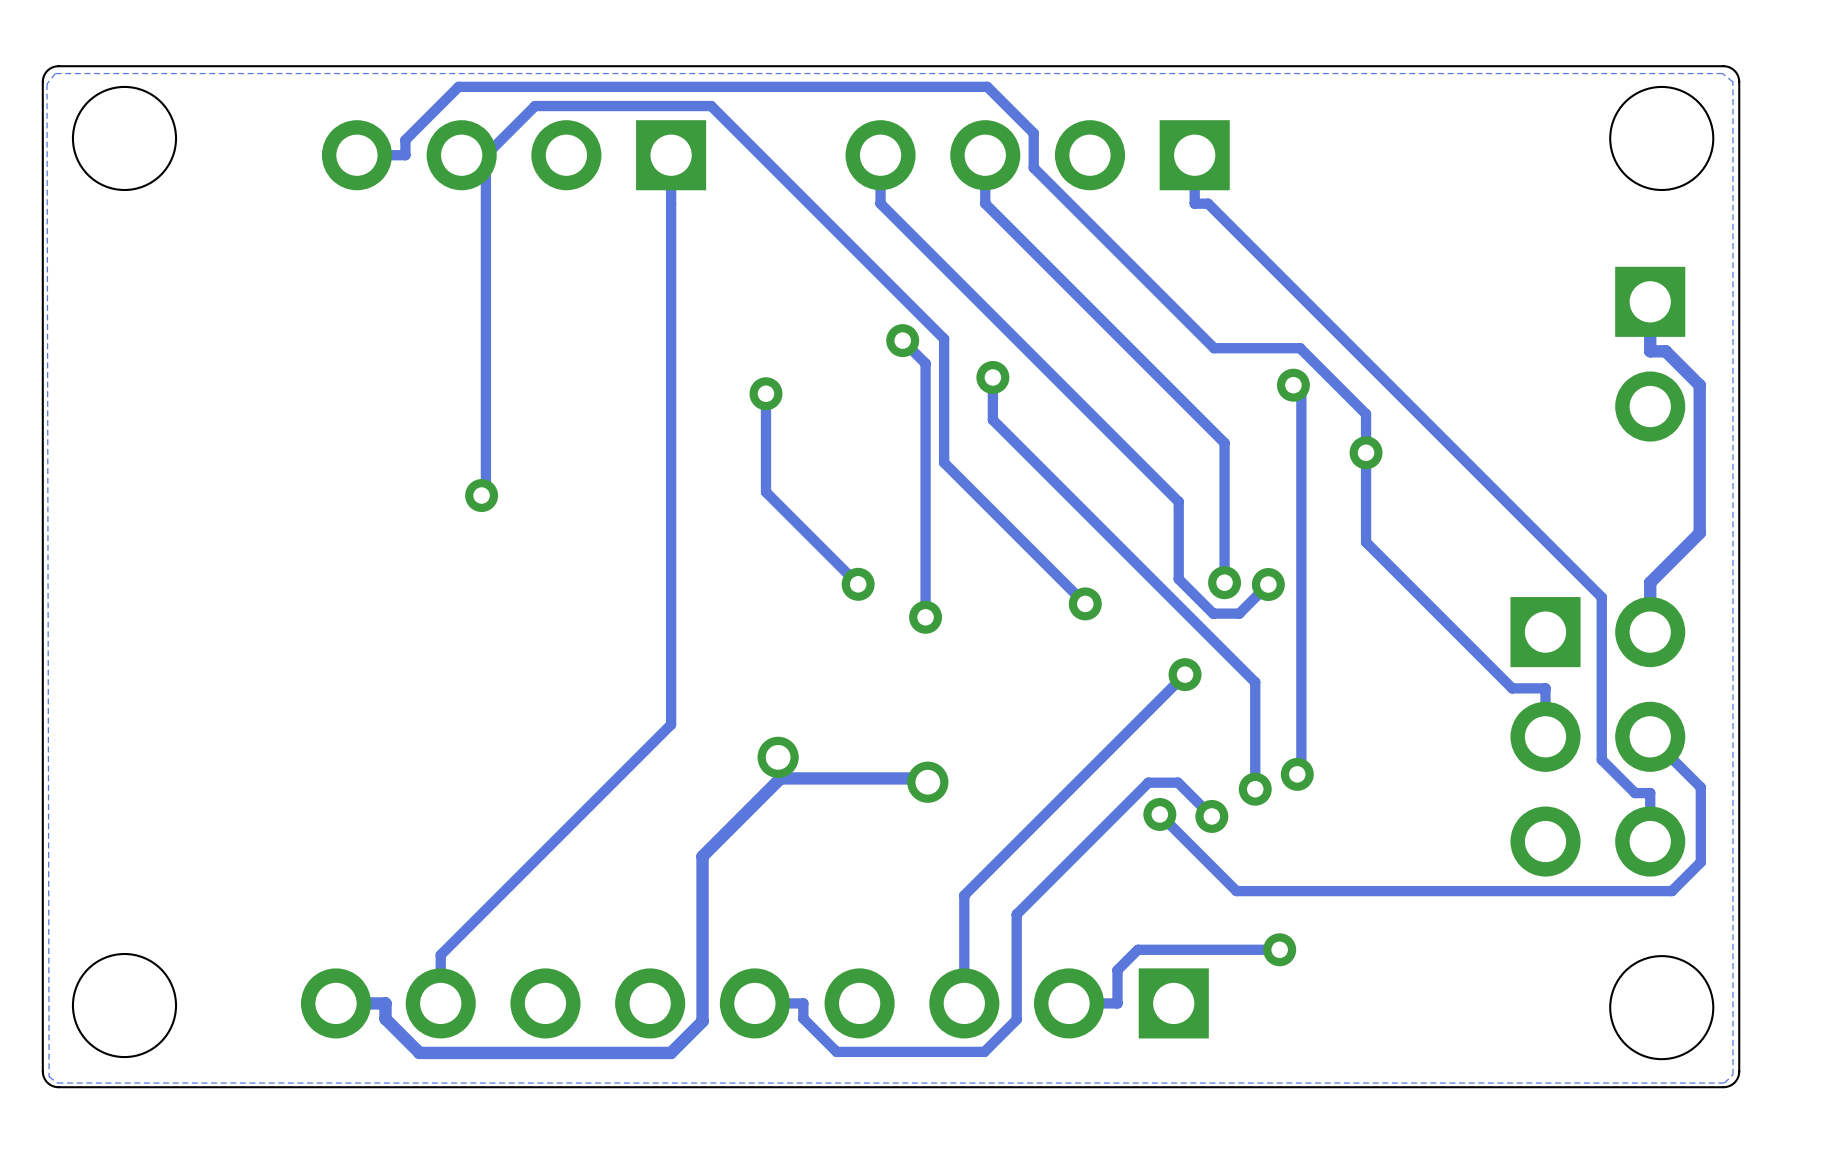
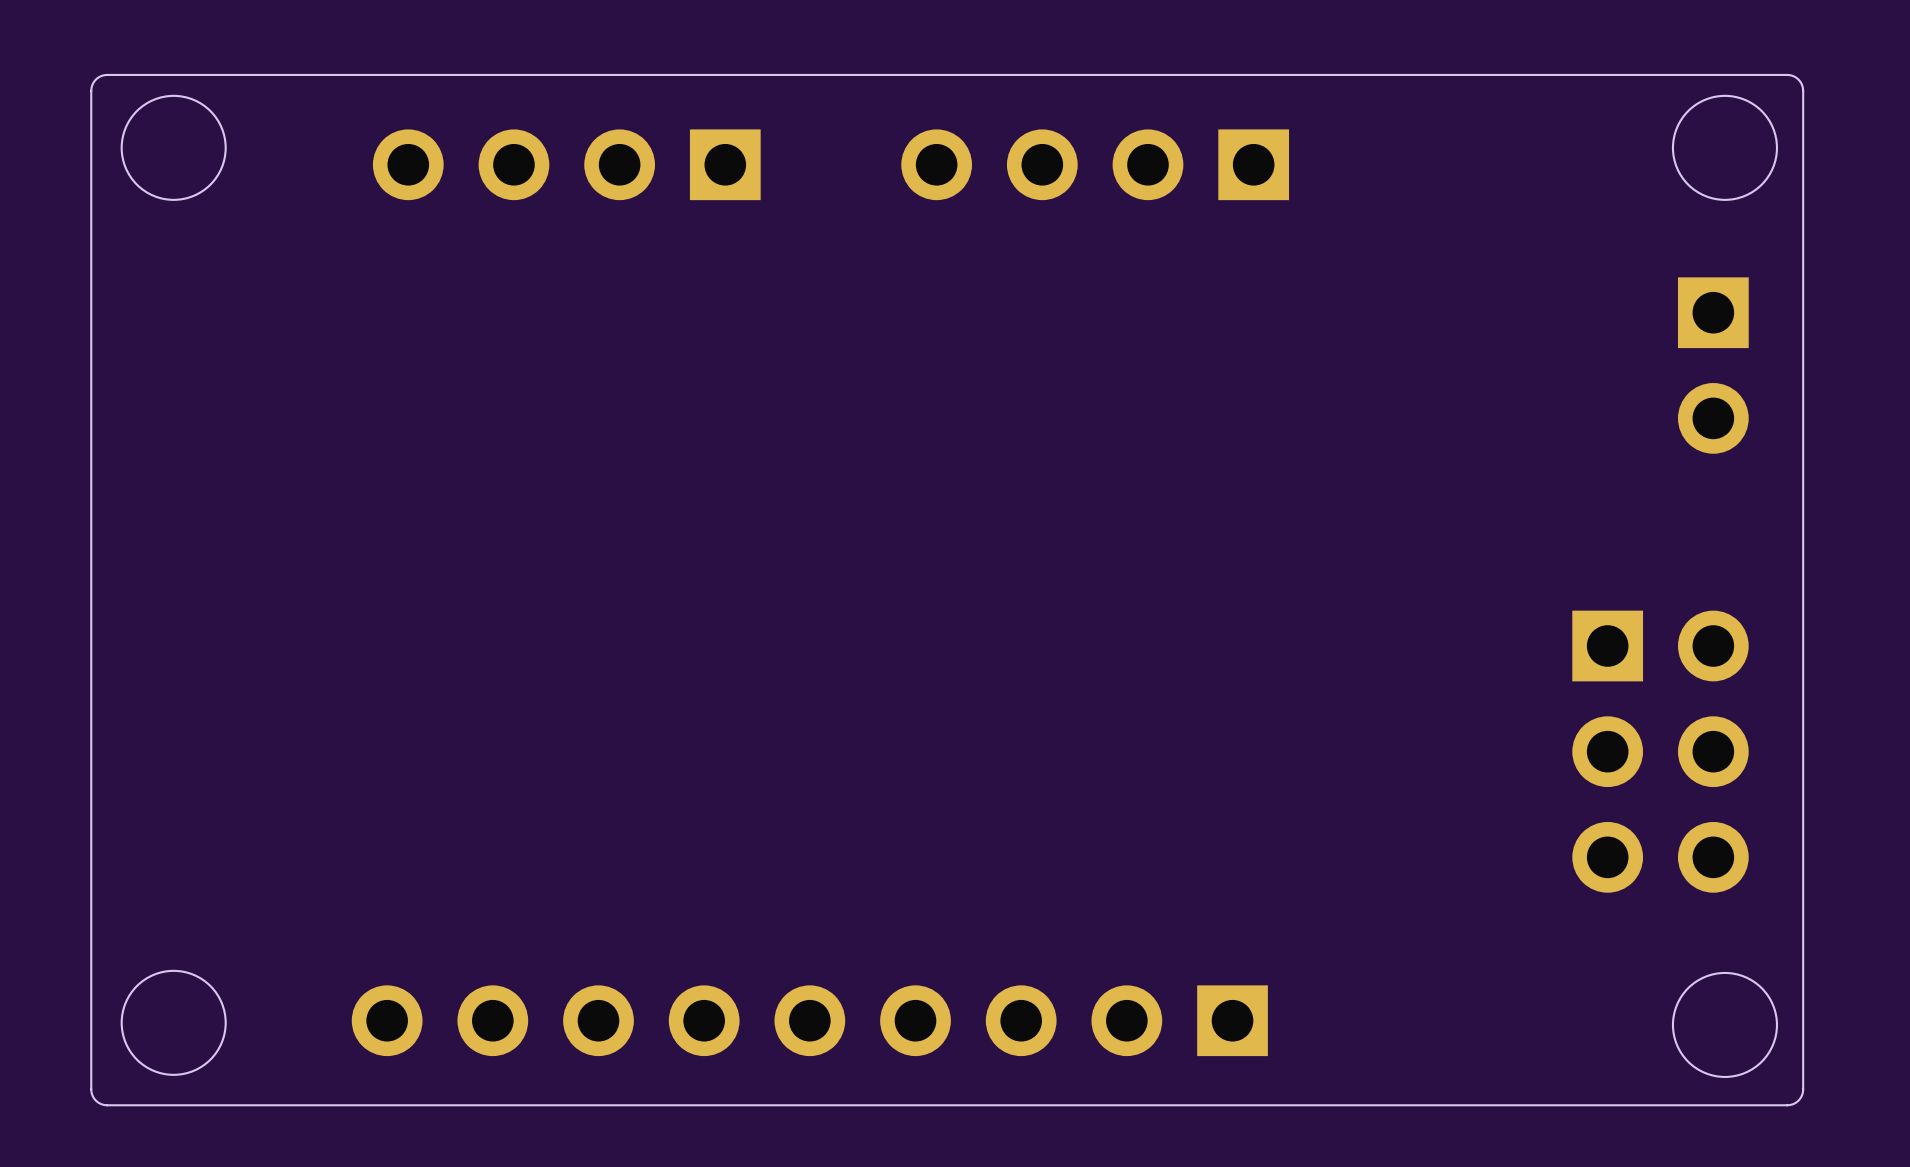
zone outline: (1722, 73) (1732, 81) (1732, 1074) (1724, 1083) (57, 1083) (49, 1076) (46, 84) (55, 73) (1722, 73) -> none
track: (356, 155) (405, 155) (405, 140) (458, 86) (987, 86) (1033, 133) (1033, 167) (1214, 348) (1300, 348) (1366, 414) (1366, 542) (1512, 688) (1545, 688) (1545, 736) -> none
track: (485, 155) (535, 106) (711, 106) (944, 338) (944, 462) (1085, 603) -> none
track: (485, 155) (485, 491) (481, 495) -> none
track: (671, 155) (671, 724) (440, 954) (440, 1003) -> none
track: (880, 155) (880, 203) (1178, 501) (1178, 579) (1213, 613) (1239, 613) (1268, 584) -> none
track: (985, 155) (985, 203) (1224, 442) (1224, 582) -> none
track: (1194, 155) (1194, 203) (1208, 203) (1601, 597) (1601, 759) (1635, 793) (1650, 793) (1650, 841) -> none
track: (1650, 301) (1650, 351) (1665, 351) (1699, 385) (1699, 533) (1650, 582) (1650, 632) -> none
track: (902, 340) (925, 363) (925, 617) -> none
via: (902, 340) -> none
track: (992, 377) (992, 419) (1255, 682) (1255, 789) -> none
via: (992, 377) -> none
track: (1293, 385) (1301, 393) (1301, 770) (1297, 774) -> none
via: (1293, 385) -> none
track: (765, 393) (765, 492) (858, 584) -> none
via: (765, 393) -> none
via: (1366, 452) -> none
via: (481, 495) -> none
via: (1224, 582) -> none
via: (858, 584) -> none
via: (1268, 584) -> none
via: (1085, 603) -> none
via: (925, 617) -> none
track: (1185, 674) (964, 895) (964, 1003) -> none
via: (1185, 674) -> none
track: (1650, 736) (1700, 787) (1700, 862) (1671, 891) (1236, 891) (1159, 814) -> none
via: (778, 757) -> none
via: (1297, 774) -> none
track: (780, 778) (924, 778) (927, 782) -> none
track: (780, 778) (702, 856) (702, 1021) (671, 1052) (419, 1052) (385, 1018) (385, 1003) (336, 1003) -> none
via: (927, 782) -> none
via: (1255, 789) -> none
via: (1159, 814) -> none
track: (1211, 816) (1178, 782) (1148, 782) (1016, 914) (1016, 1019) (984, 1051) (836, 1051) (803, 1018) (803, 1003) (754, 1003) -> none
via: (1211, 816) -> none
track: (1279, 949) (1137, 949) (1117, 970) (1117, 1003) (1069, 1003) -> none
via: (1279, 949) -> none

